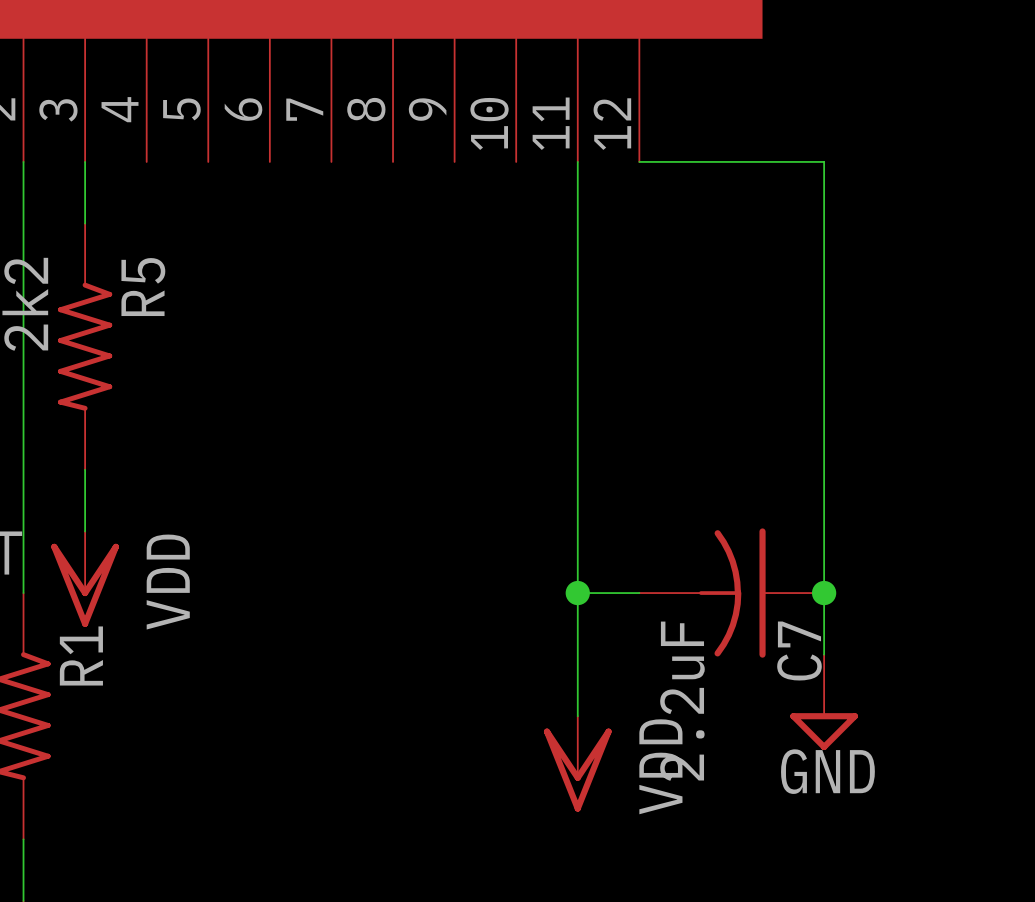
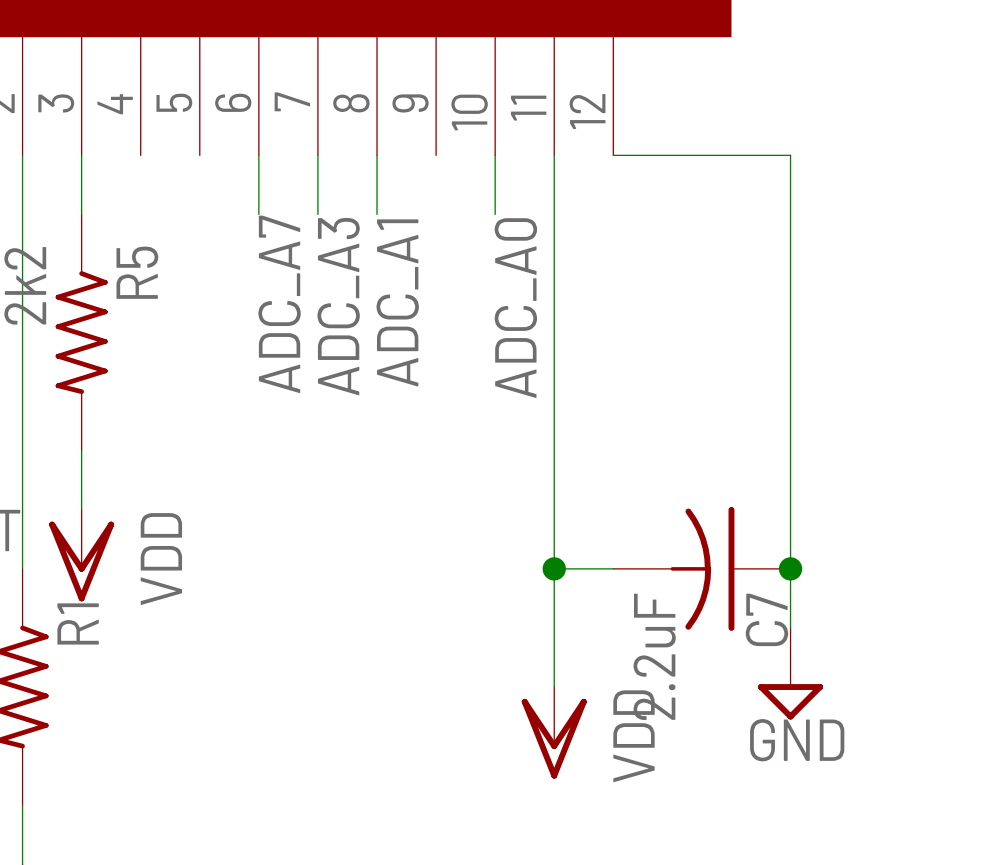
wire: none -> (258, 155) (258, 214)
wire: none -> (317, 155) (317, 214)
wire: none -> (377, 155) (377, 214)
wire: none -> (495, 155) (495, 214)
label: none -> ADC_A7 (279, 304)
label: none -> ADC_A1 (397, 303)
label: none -> ADC_A0 (515, 308)
label: none -> ADC_A3 (338, 306)

